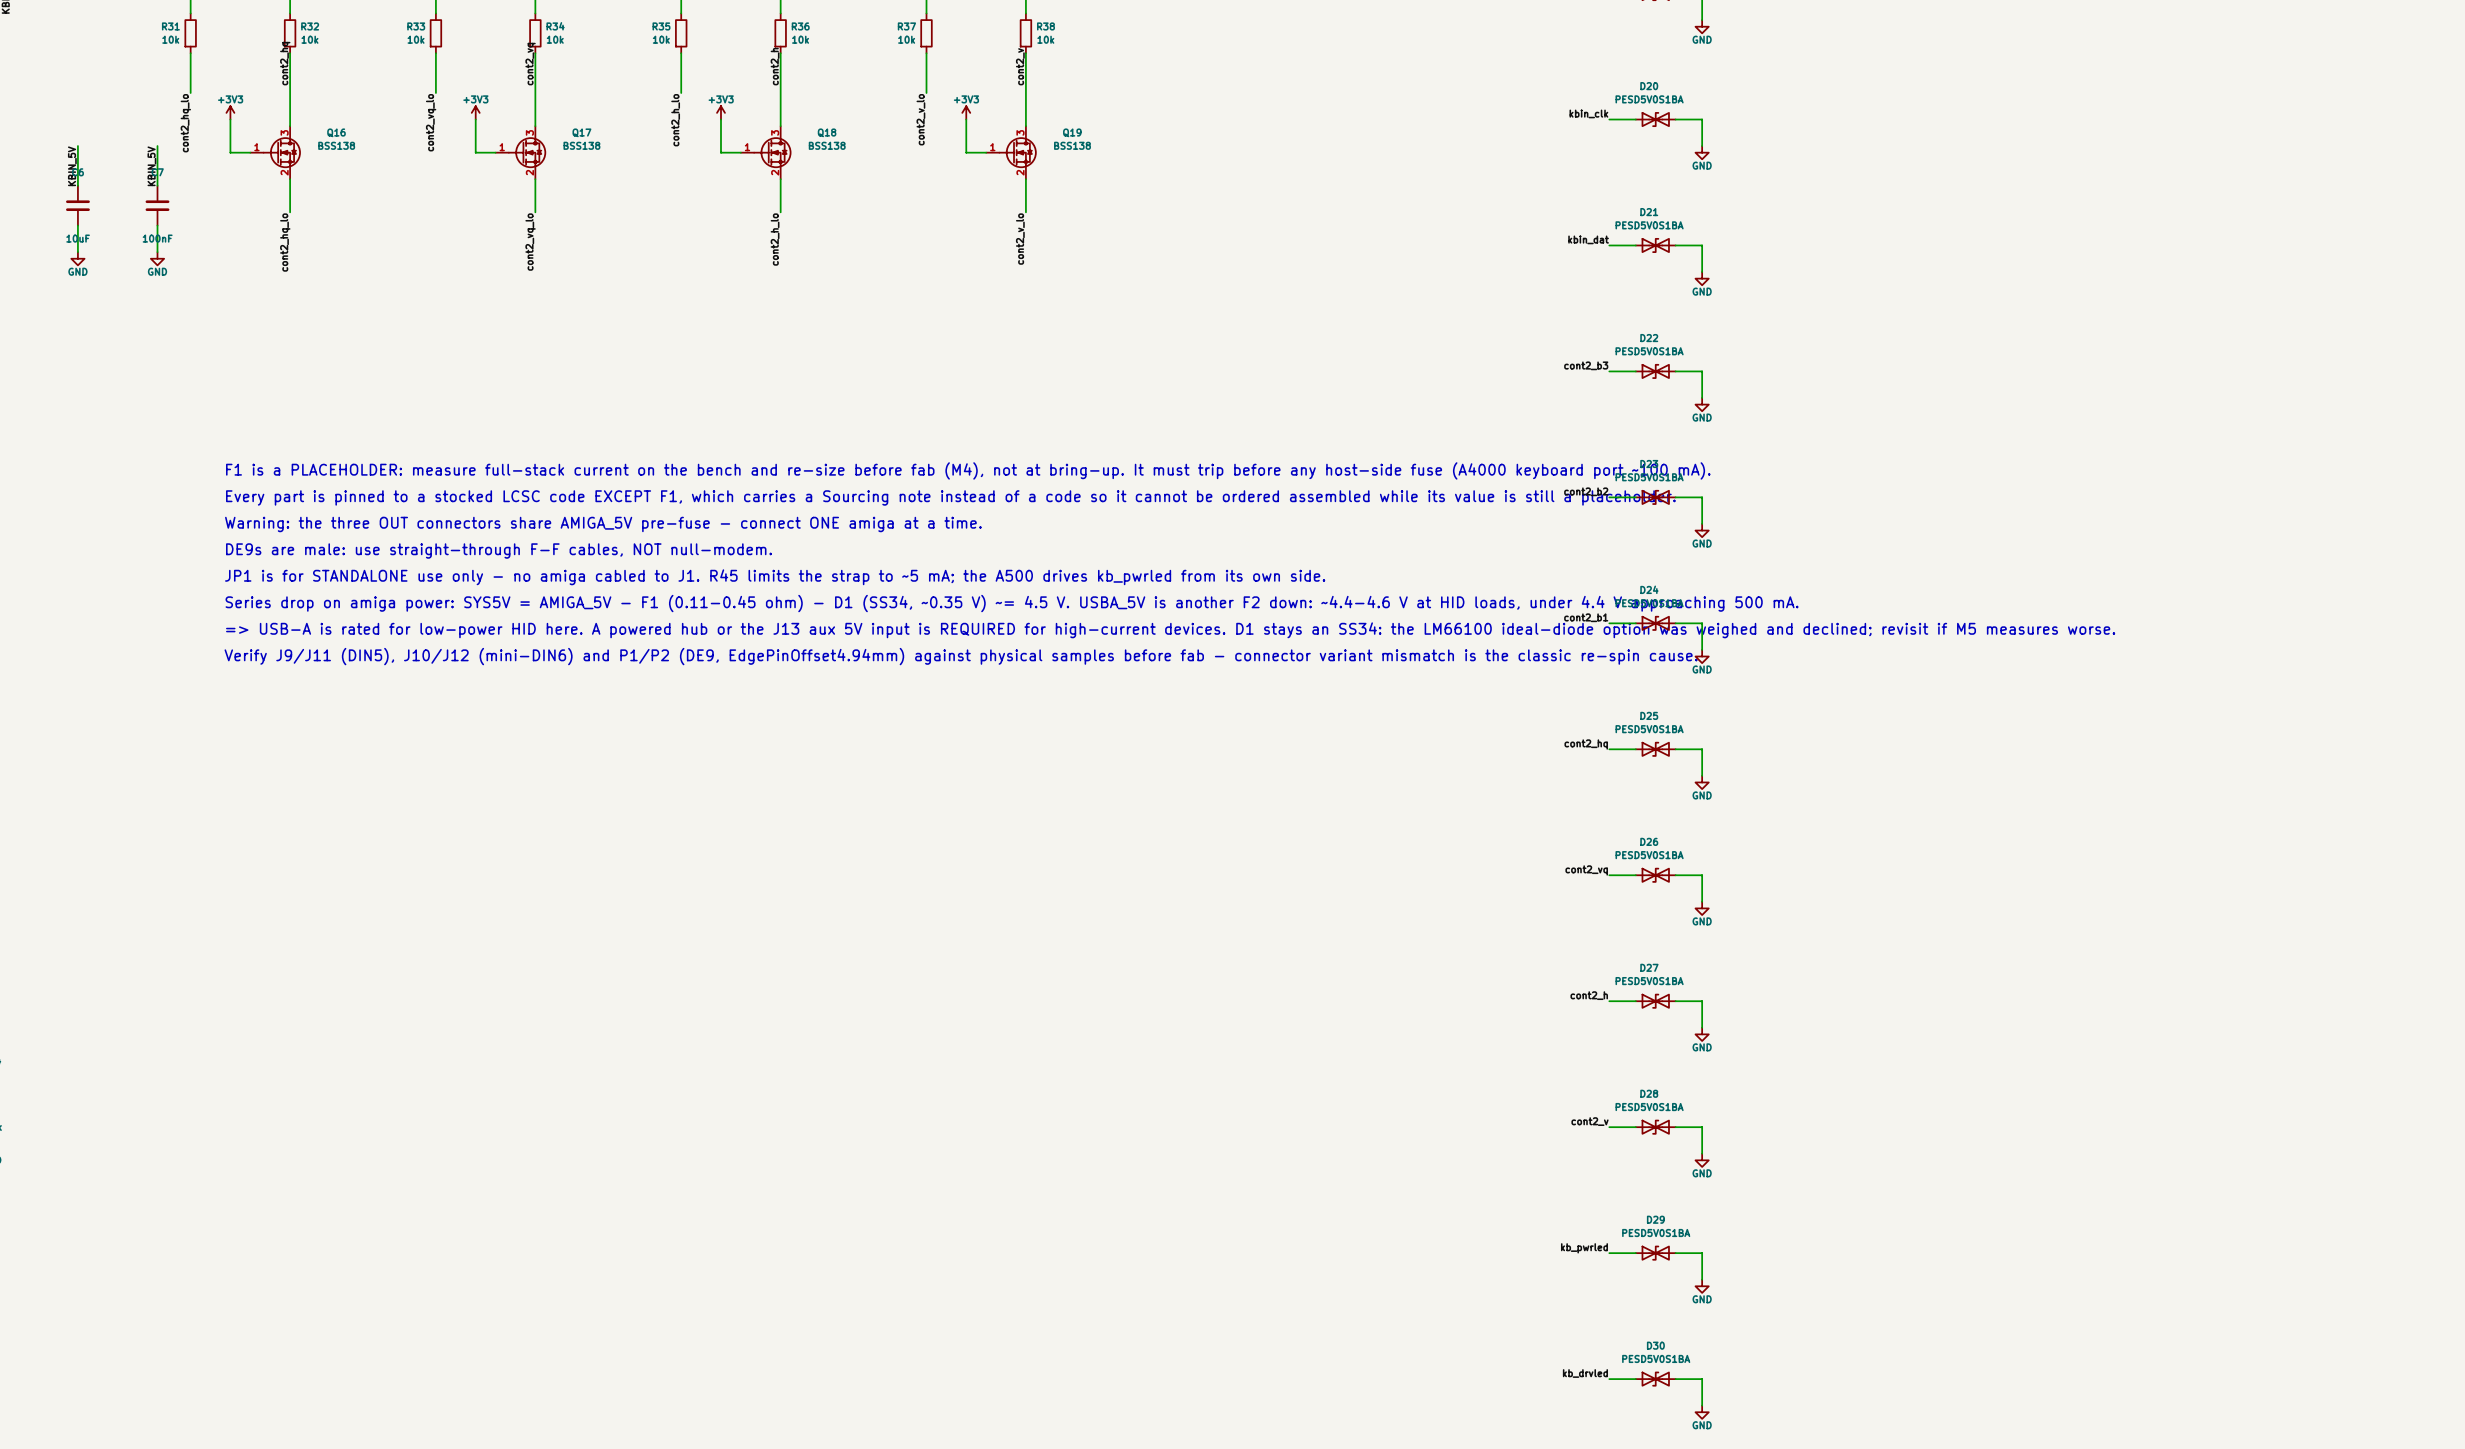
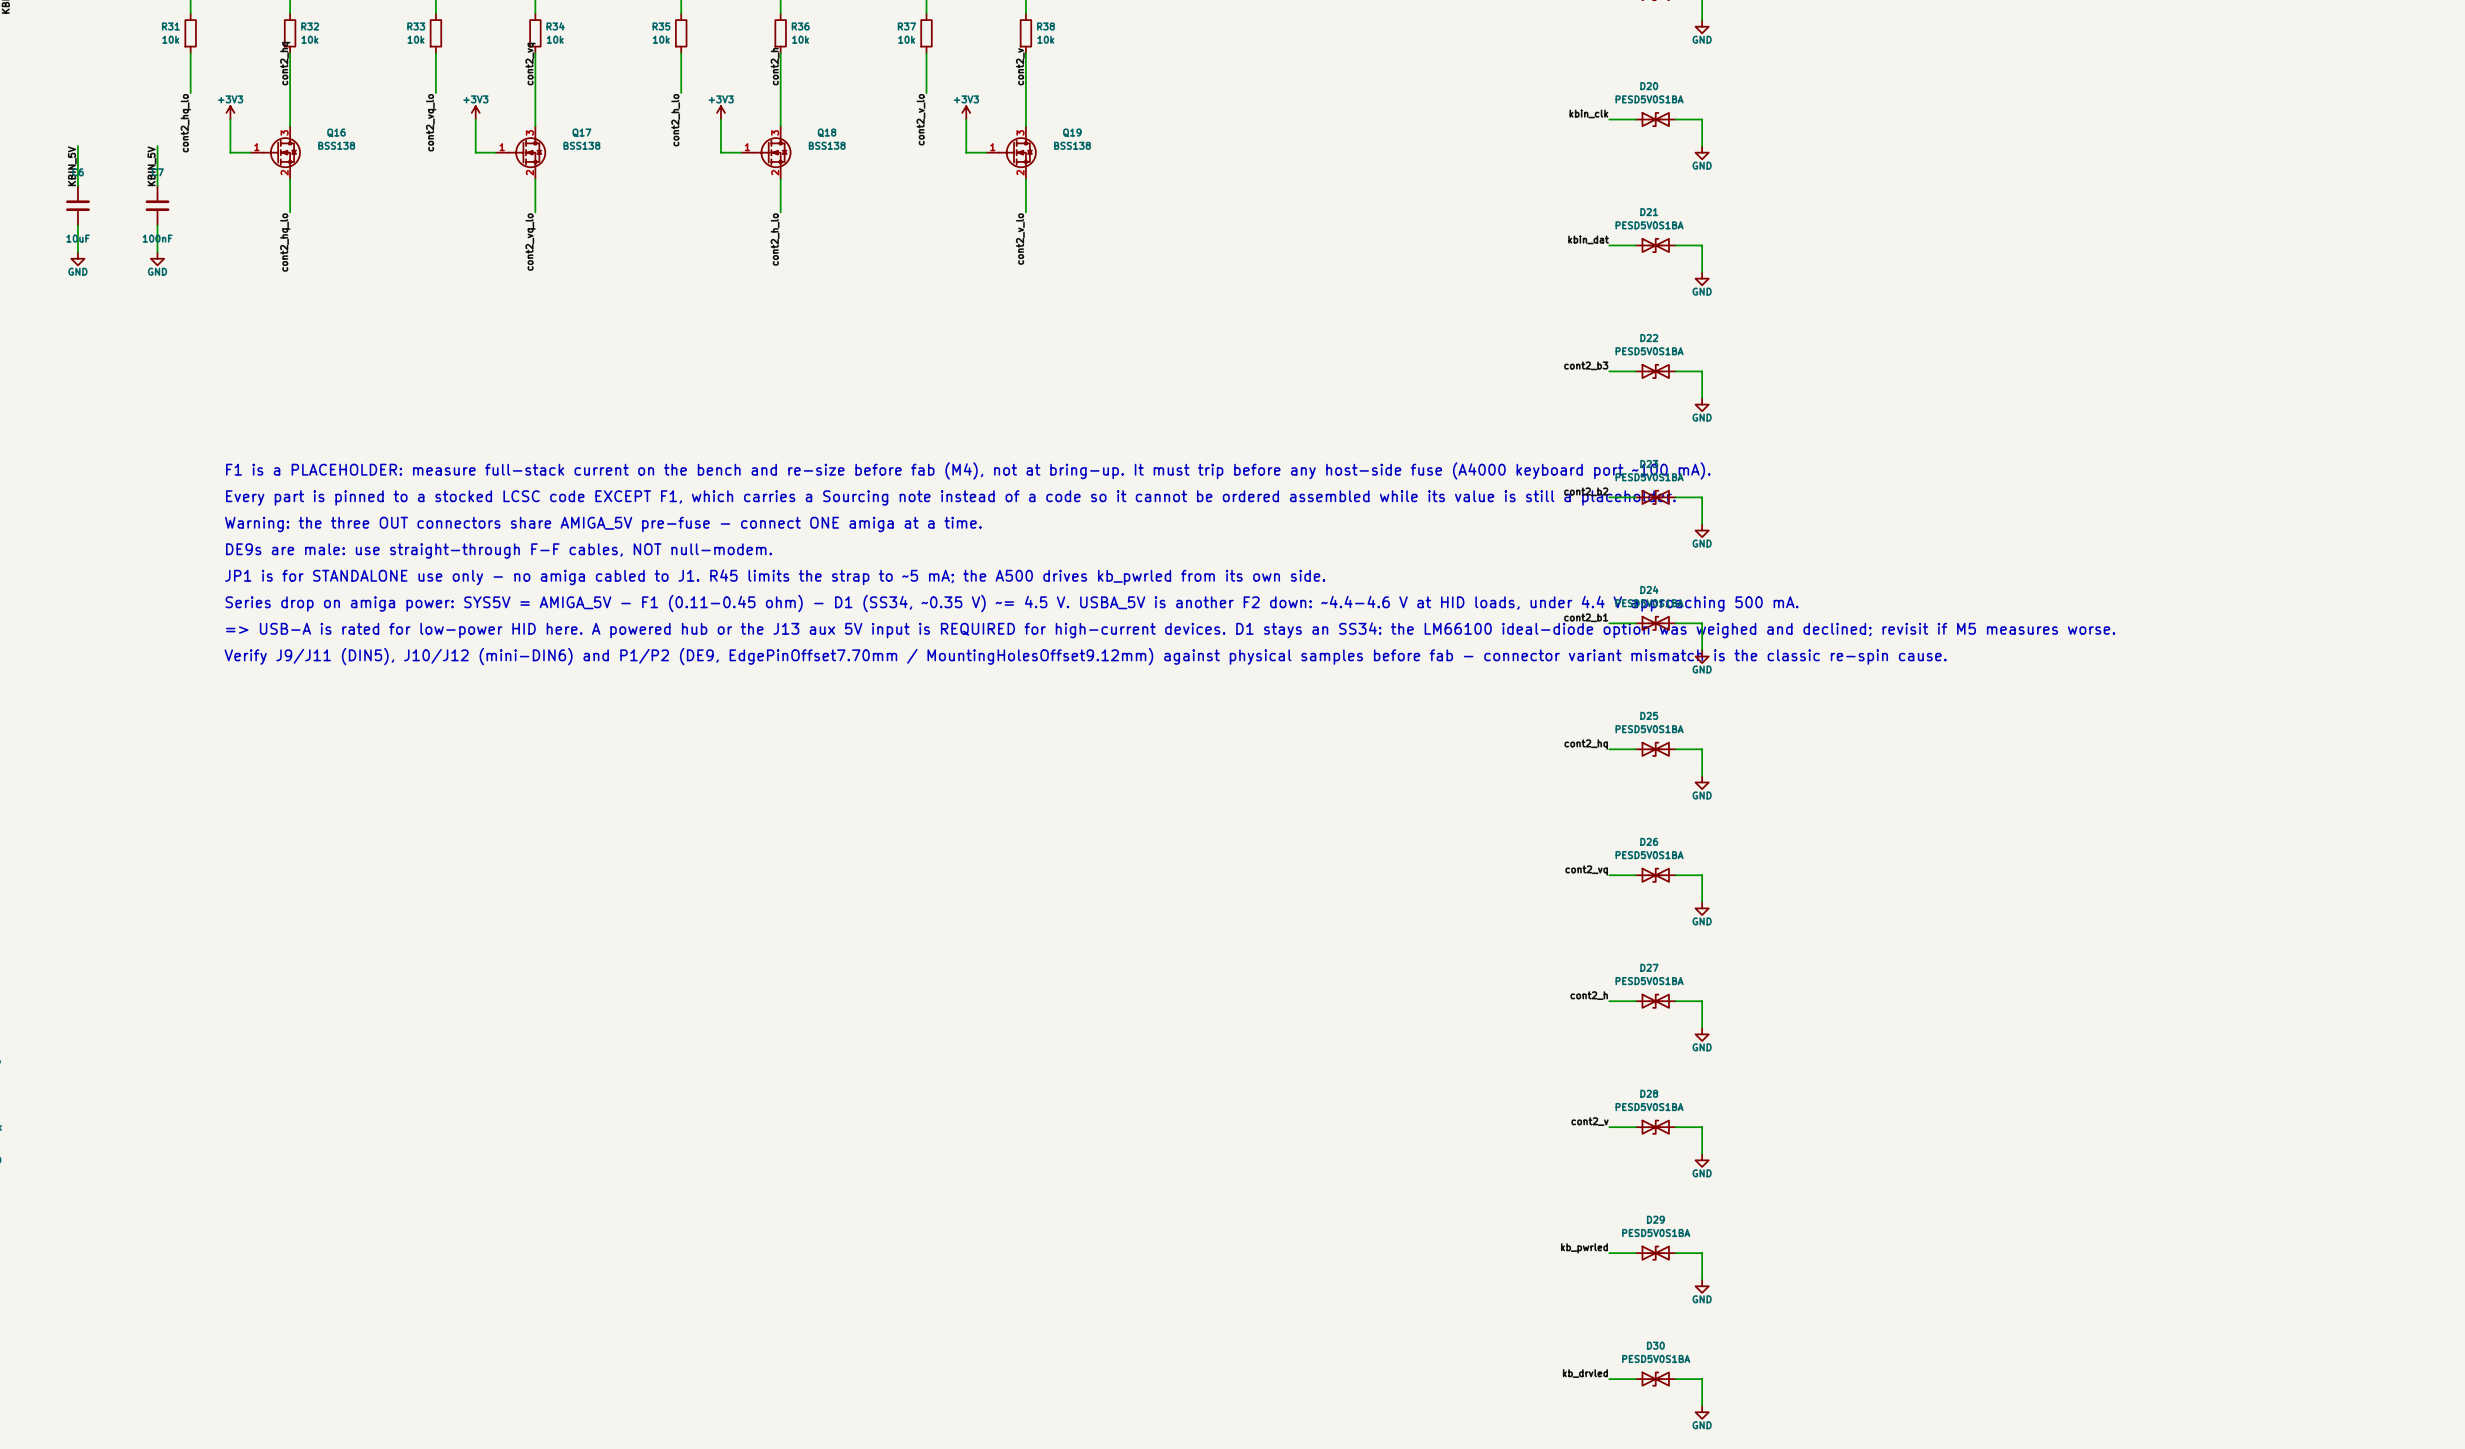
text: Verify J9/J11 (DIN5), J10/J12 (mini-DIN6) and P1/P2 (DE9, EdgePinOffset4.94mm) against physical samples before fab - connector variant mismatch is the classic re-spin cause. (961, 656) -> Verify J9/J11 (DIN5), J10/J12 (mini-DIN6) and P1/P2 (DE9, EdgePinOffset7.70mm / MountingHolesOffset9.12mm) against physical samples before fab - connector variant mismatch is the classic re-spin cause. (1085, 656)

